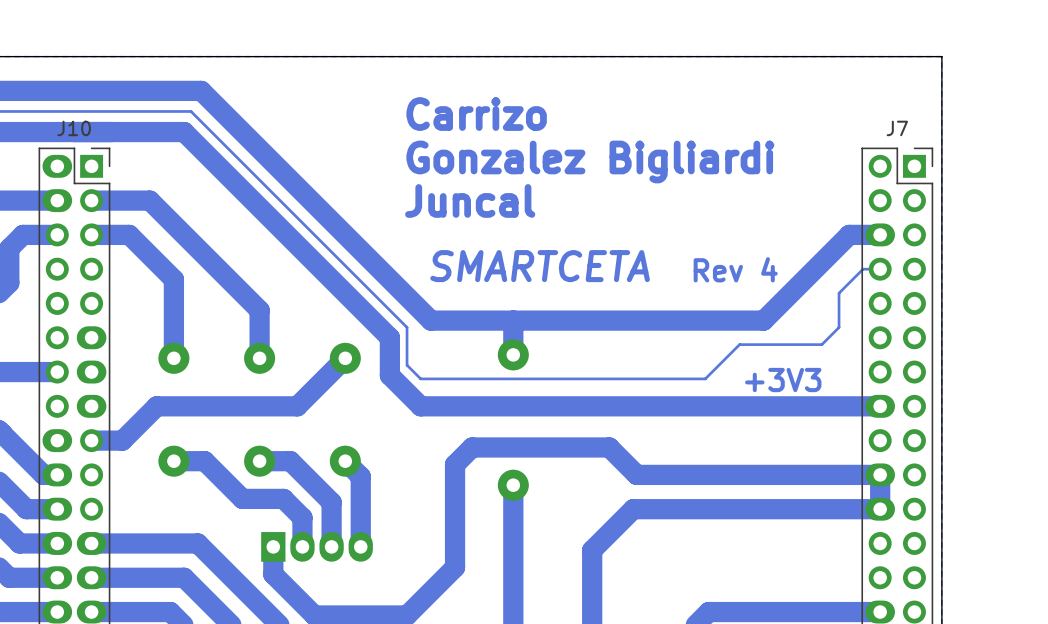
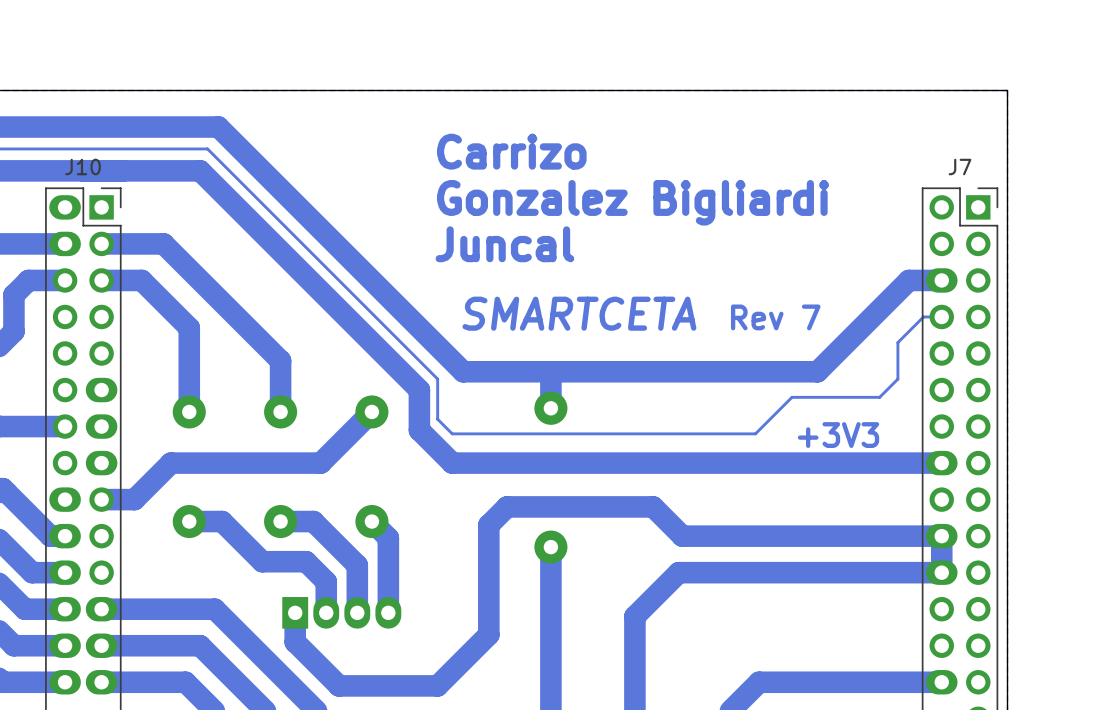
text: Rev 4 (735, 269) -> Rev 7 (775, 317)

